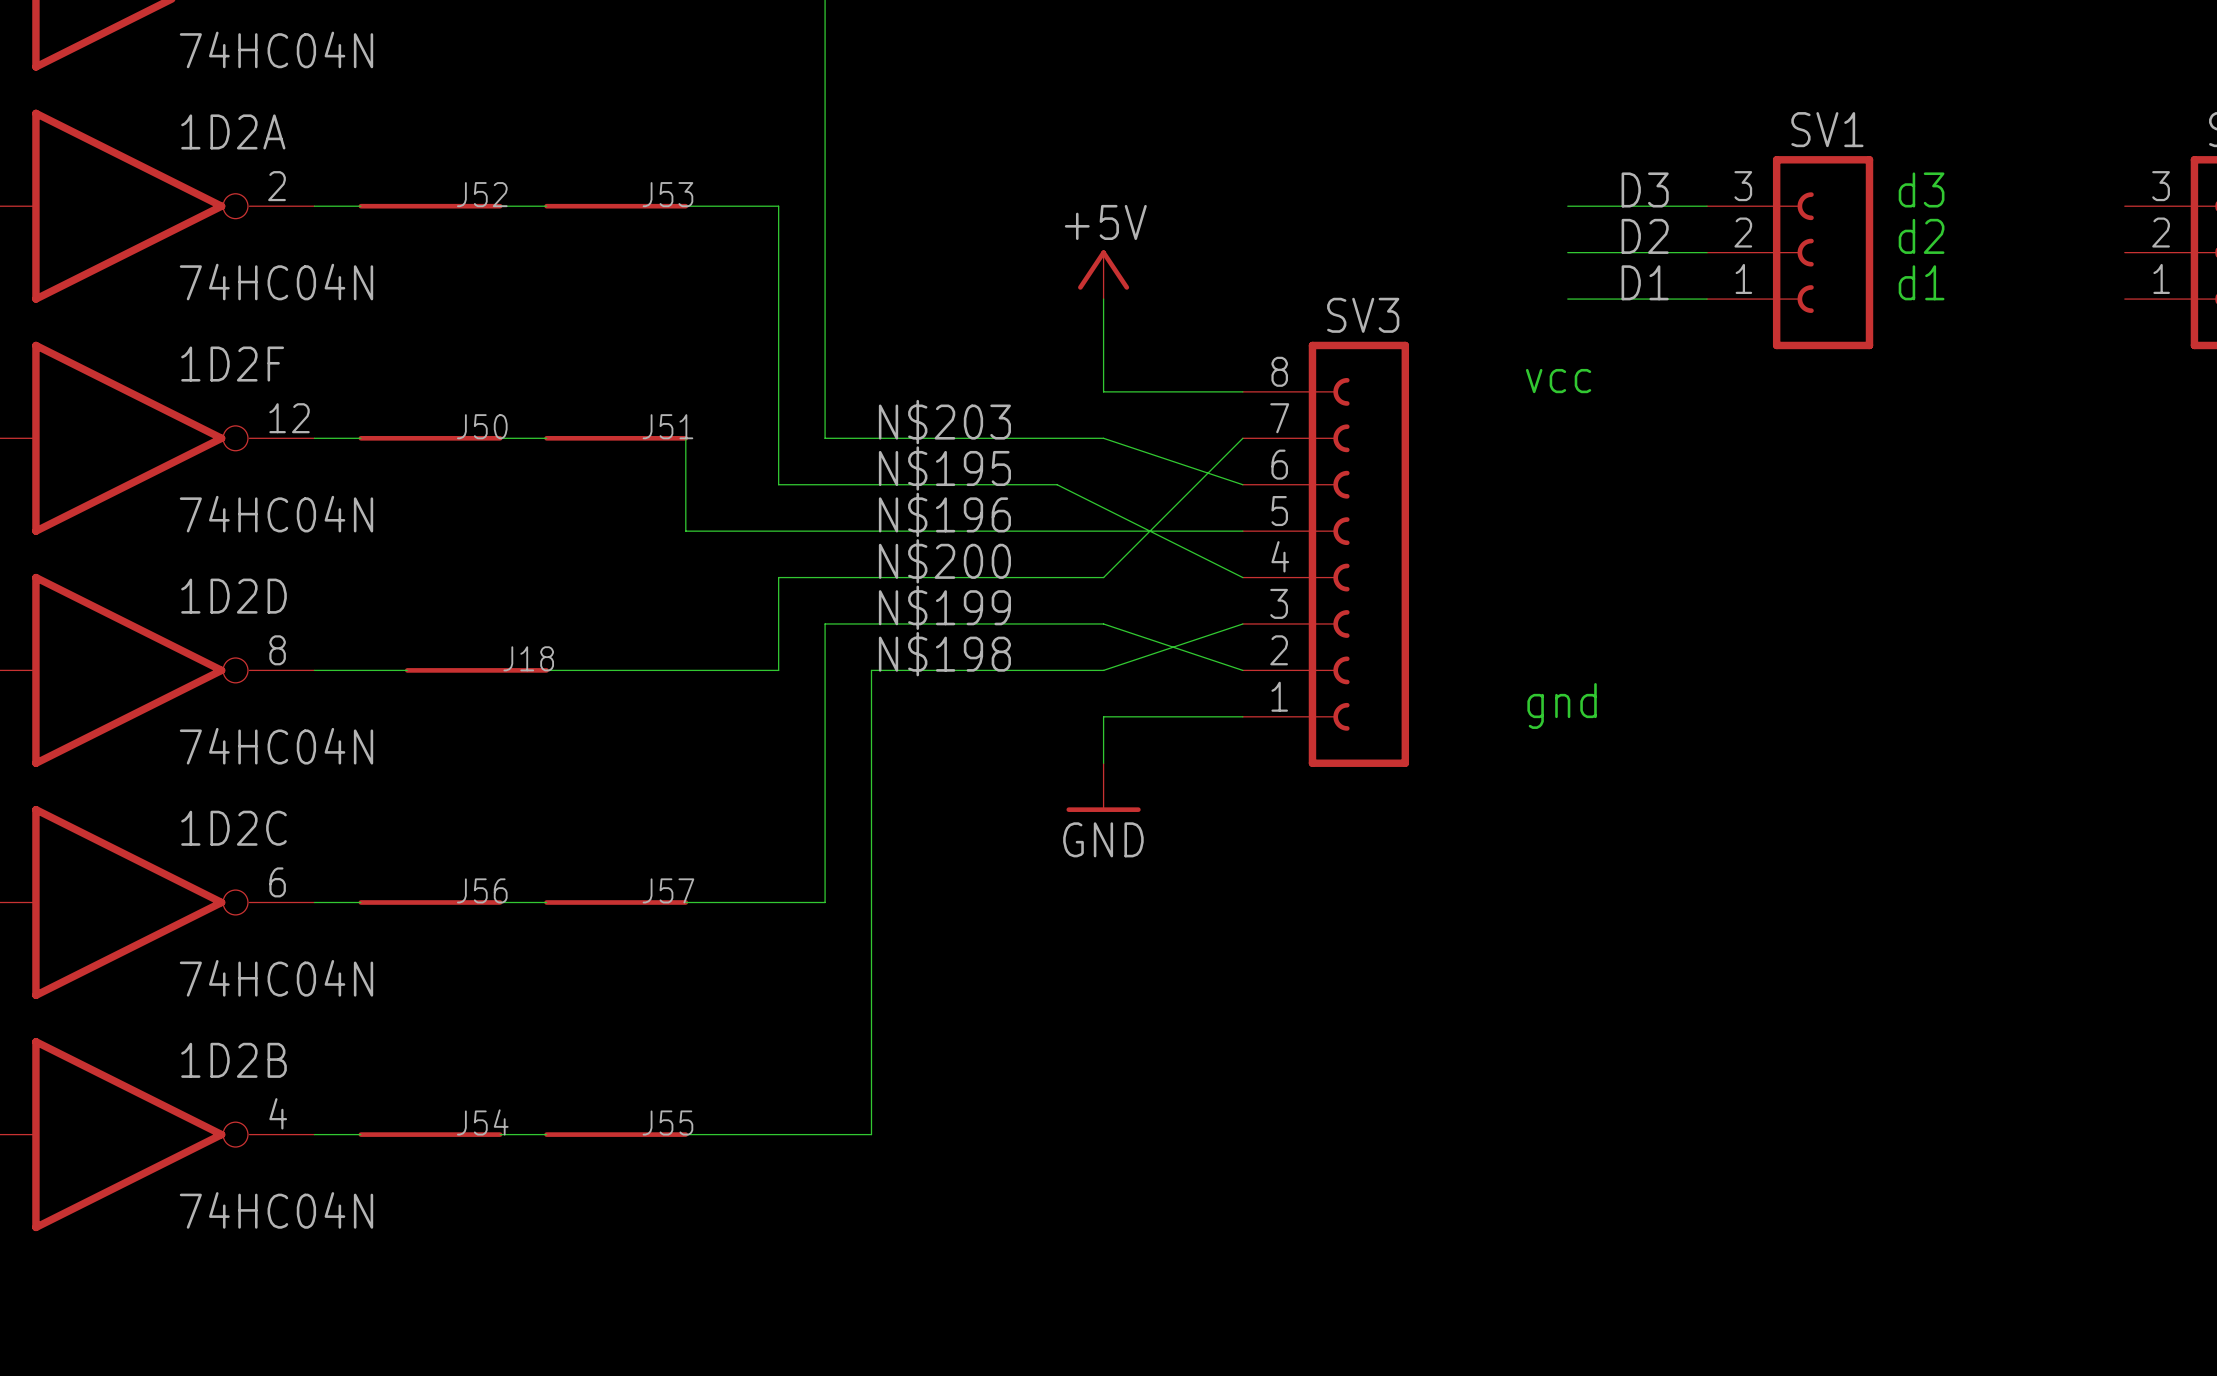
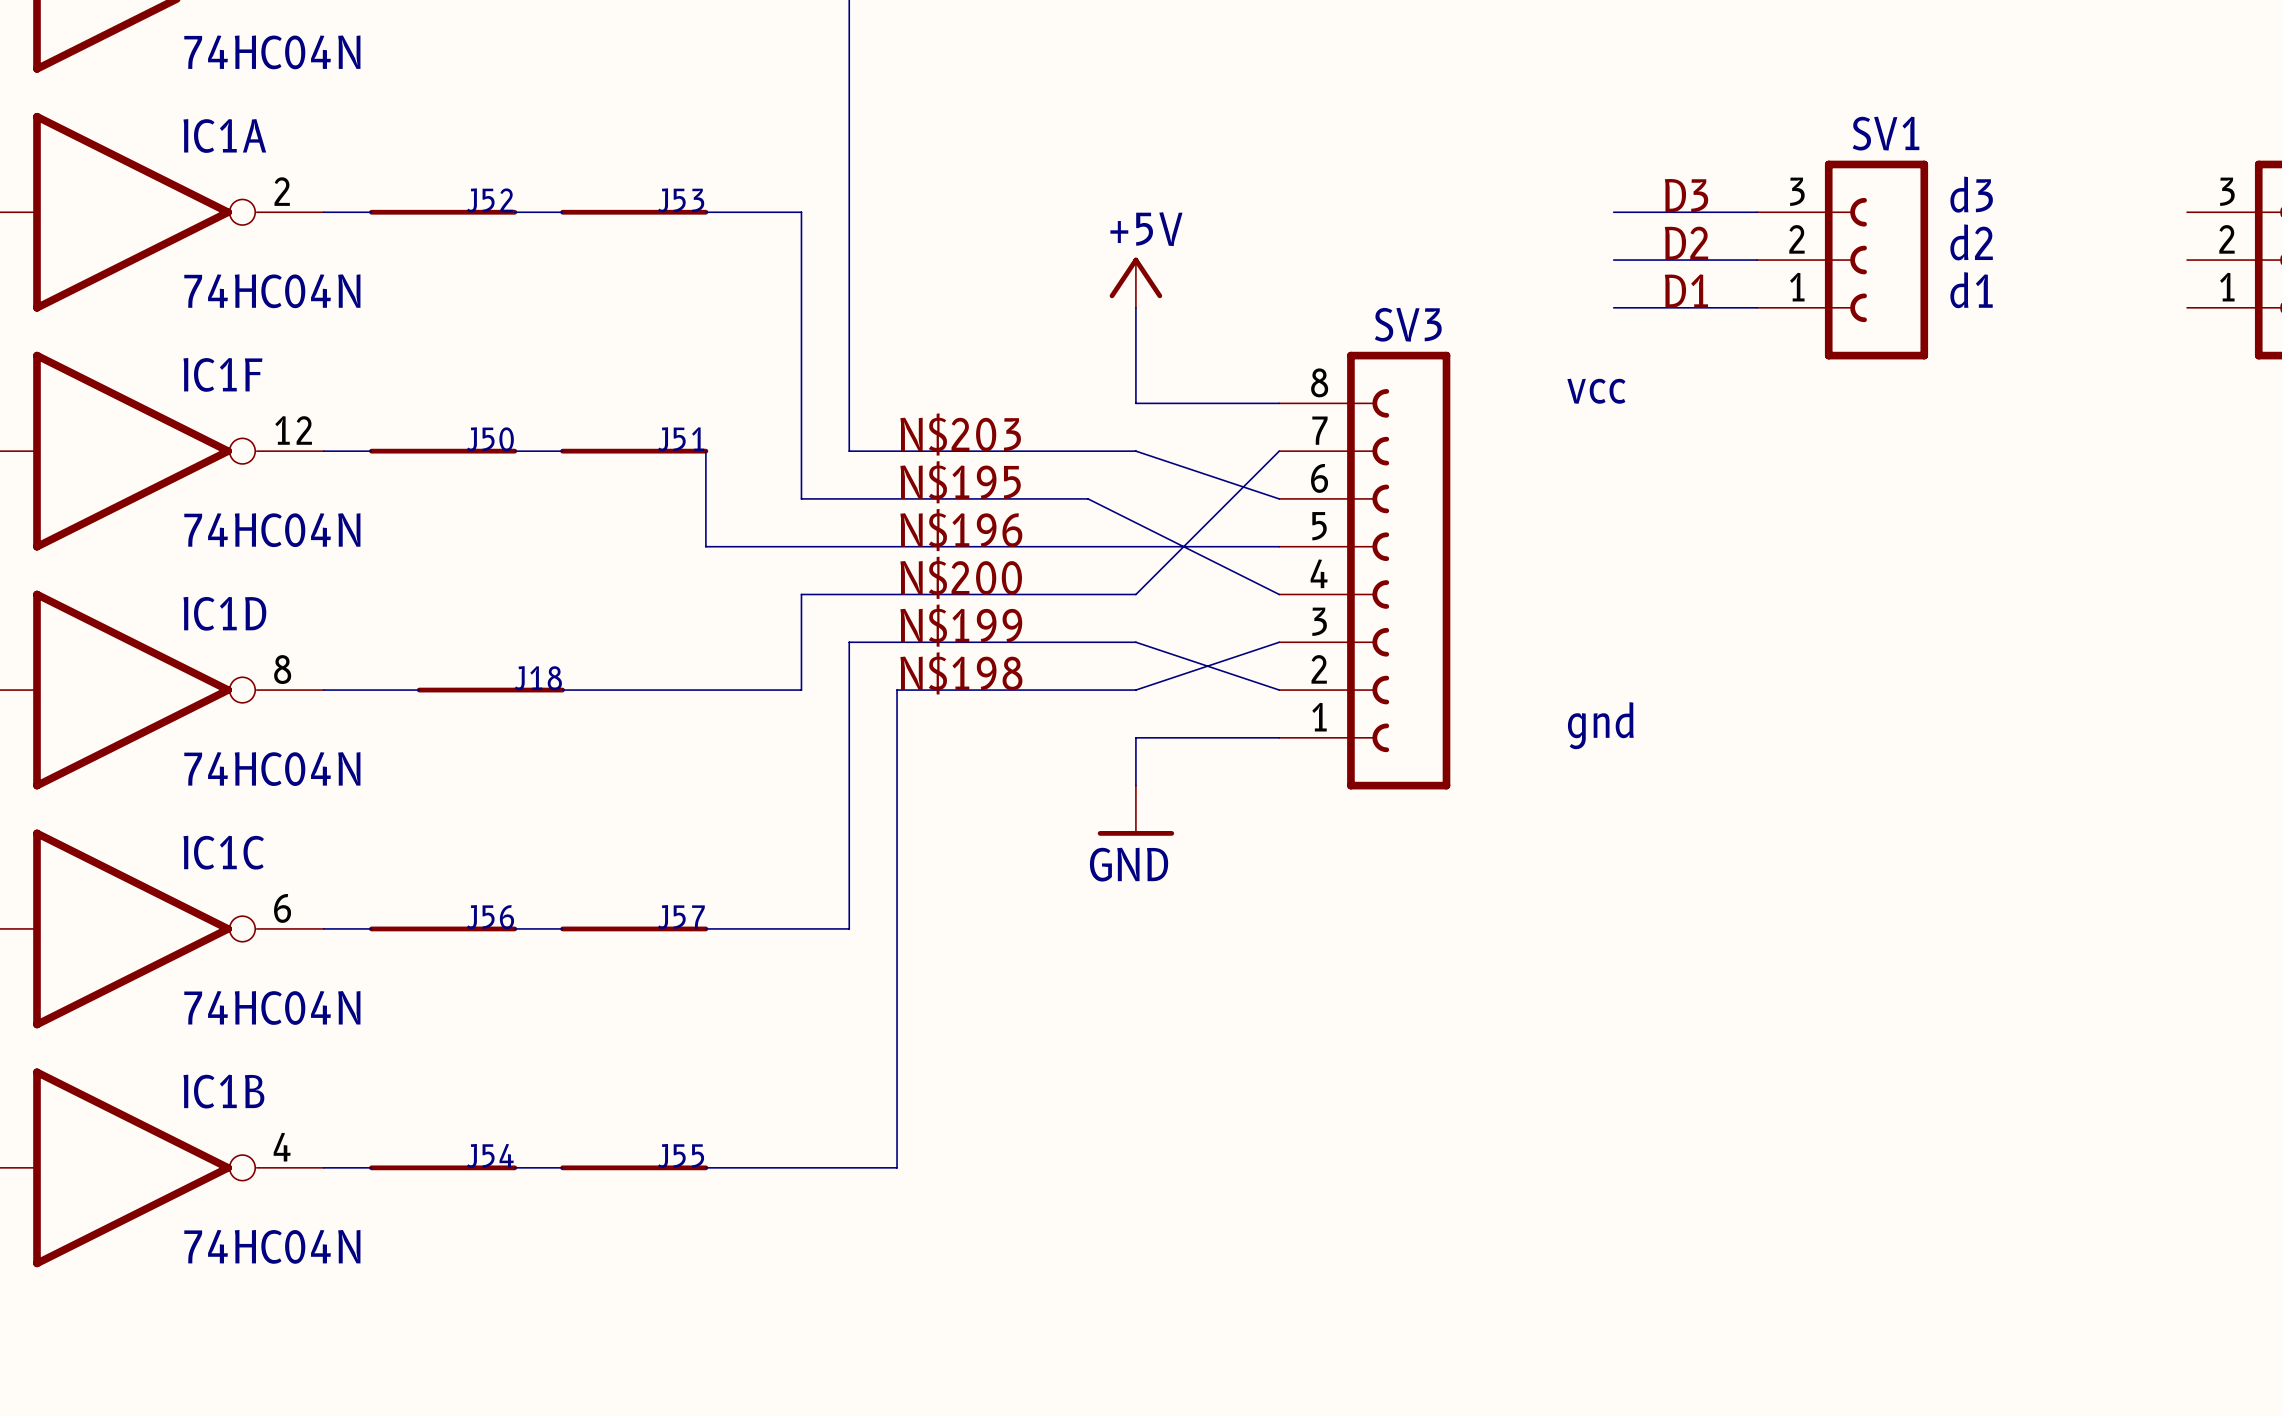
1D2A name: 1D2A (233, 131) -> IC1A (224, 135)
1D2F name: 1D2F (232, 364) -> IC1F (222, 374)
1D2D name: 1D2D (234, 596) -> IC1D (224, 613)
1D2C name: 1D2C (234, 828) -> IC1C (223, 852)
1D2B name: 1D2B (234, 1060) -> IC1B (223, 1091)

